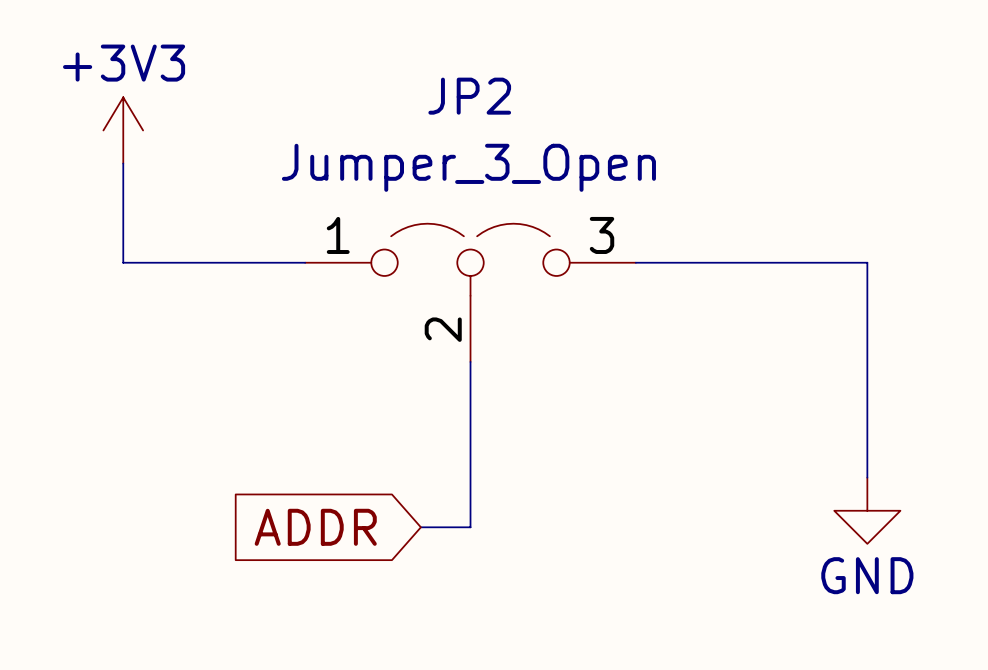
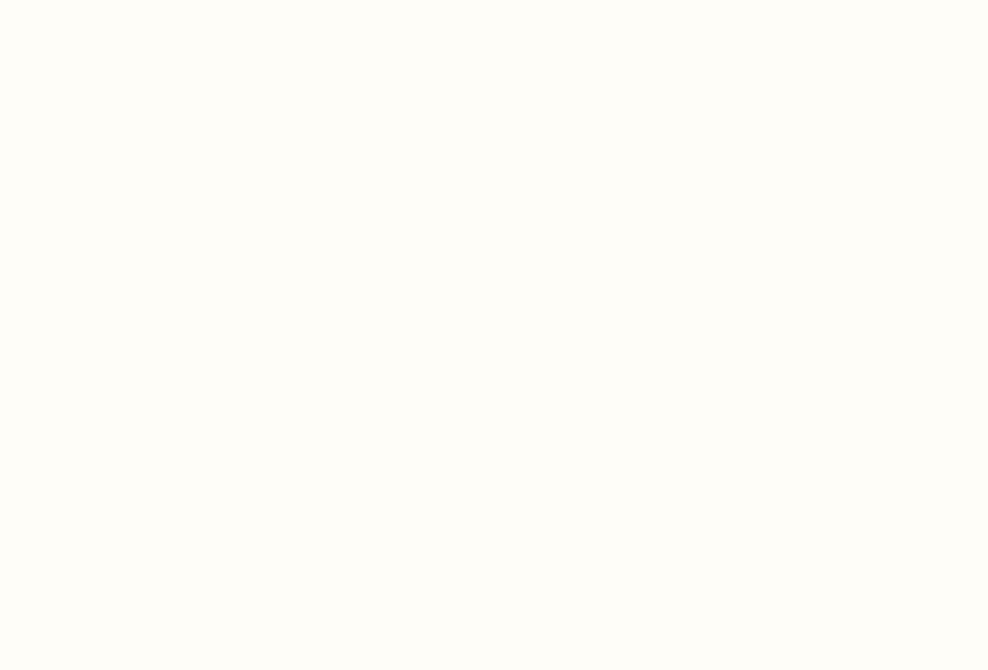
power symbol: +3V3 (123, 130) -> none
wire: (123, 163) (123, 262) (305, 262) -> none
wire: (635, 262) (867, 262) (867, 477) -> none
JP2: Jumper_3_Open (470, 292) -> none
wire: (470, 361) (470, 527) (420, 527) -> none
power symbol: GND (867, 510) -> none
global label: ADDR (315, 527) -> none

